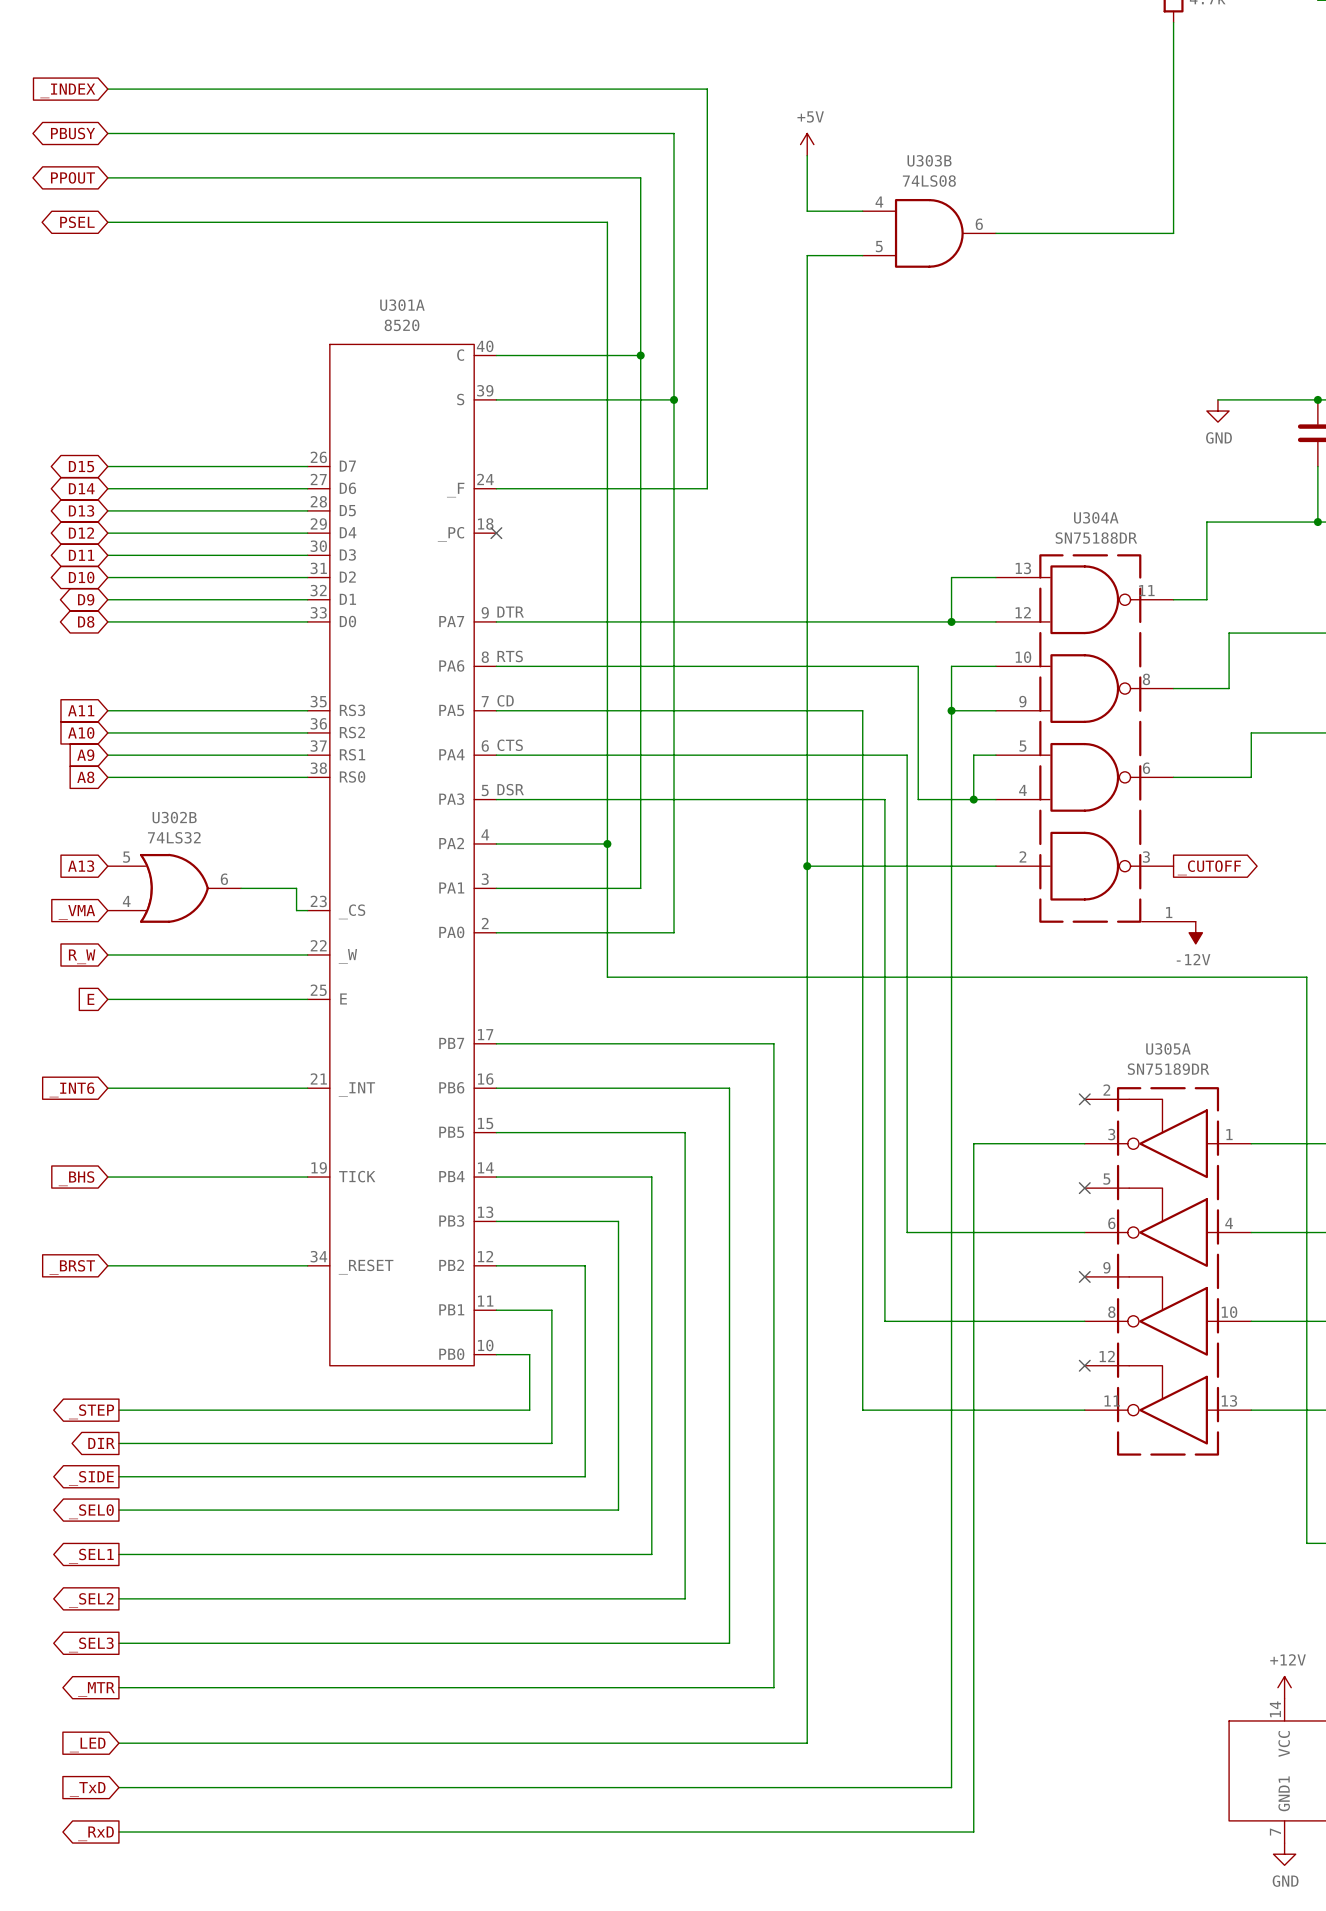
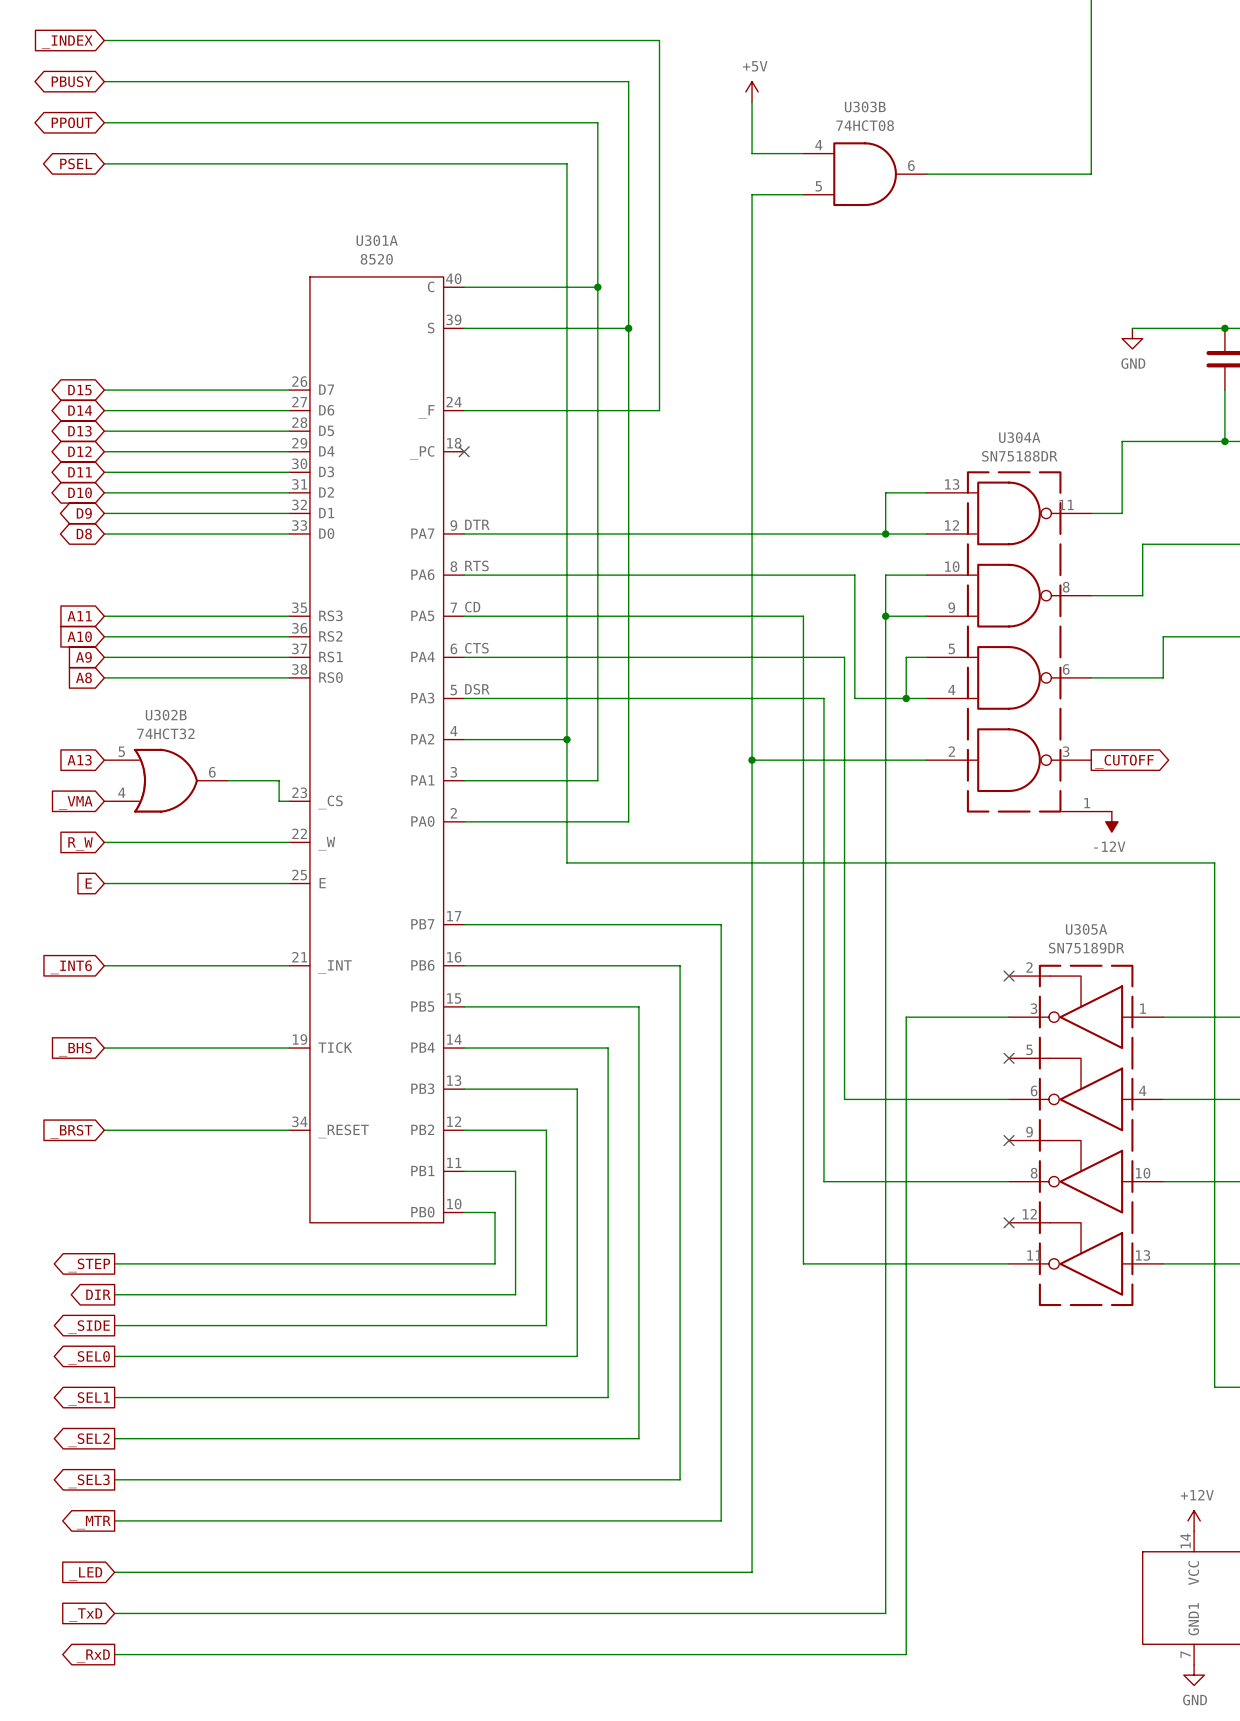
U303B value: 74LS08 (929, 181) -> 74HCT08 (865, 125)
U302B value: 74LS32 (174, 837) -> 74HCT32 (165, 733)

